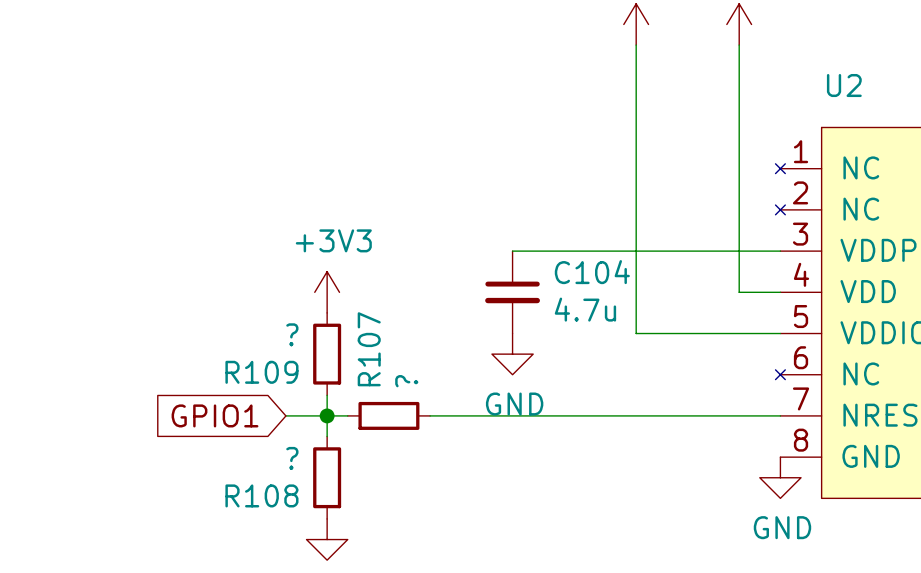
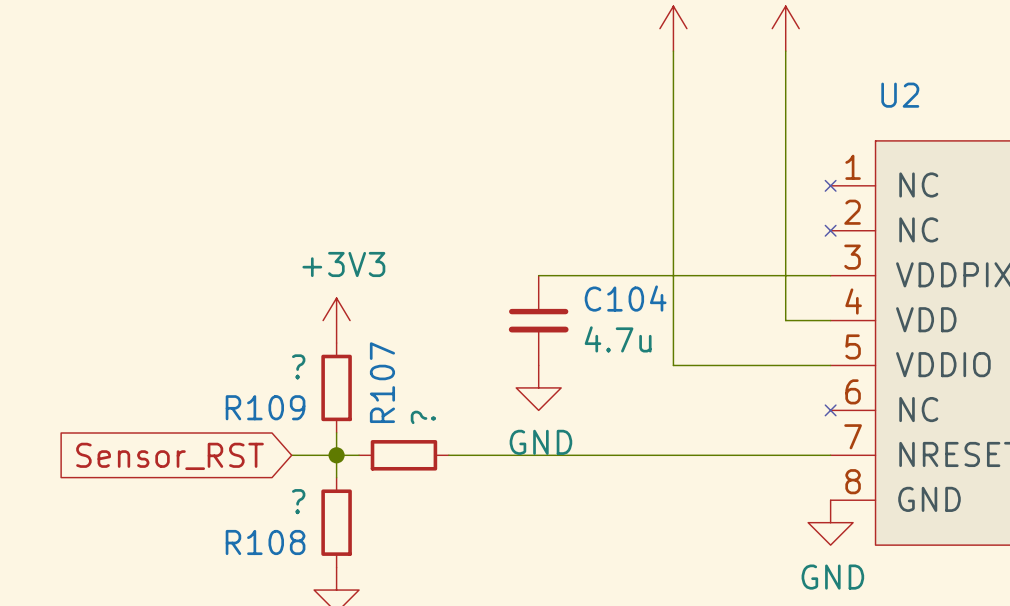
global label: GPIO1 (215, 415) -> Sensor_RST (170, 456)

